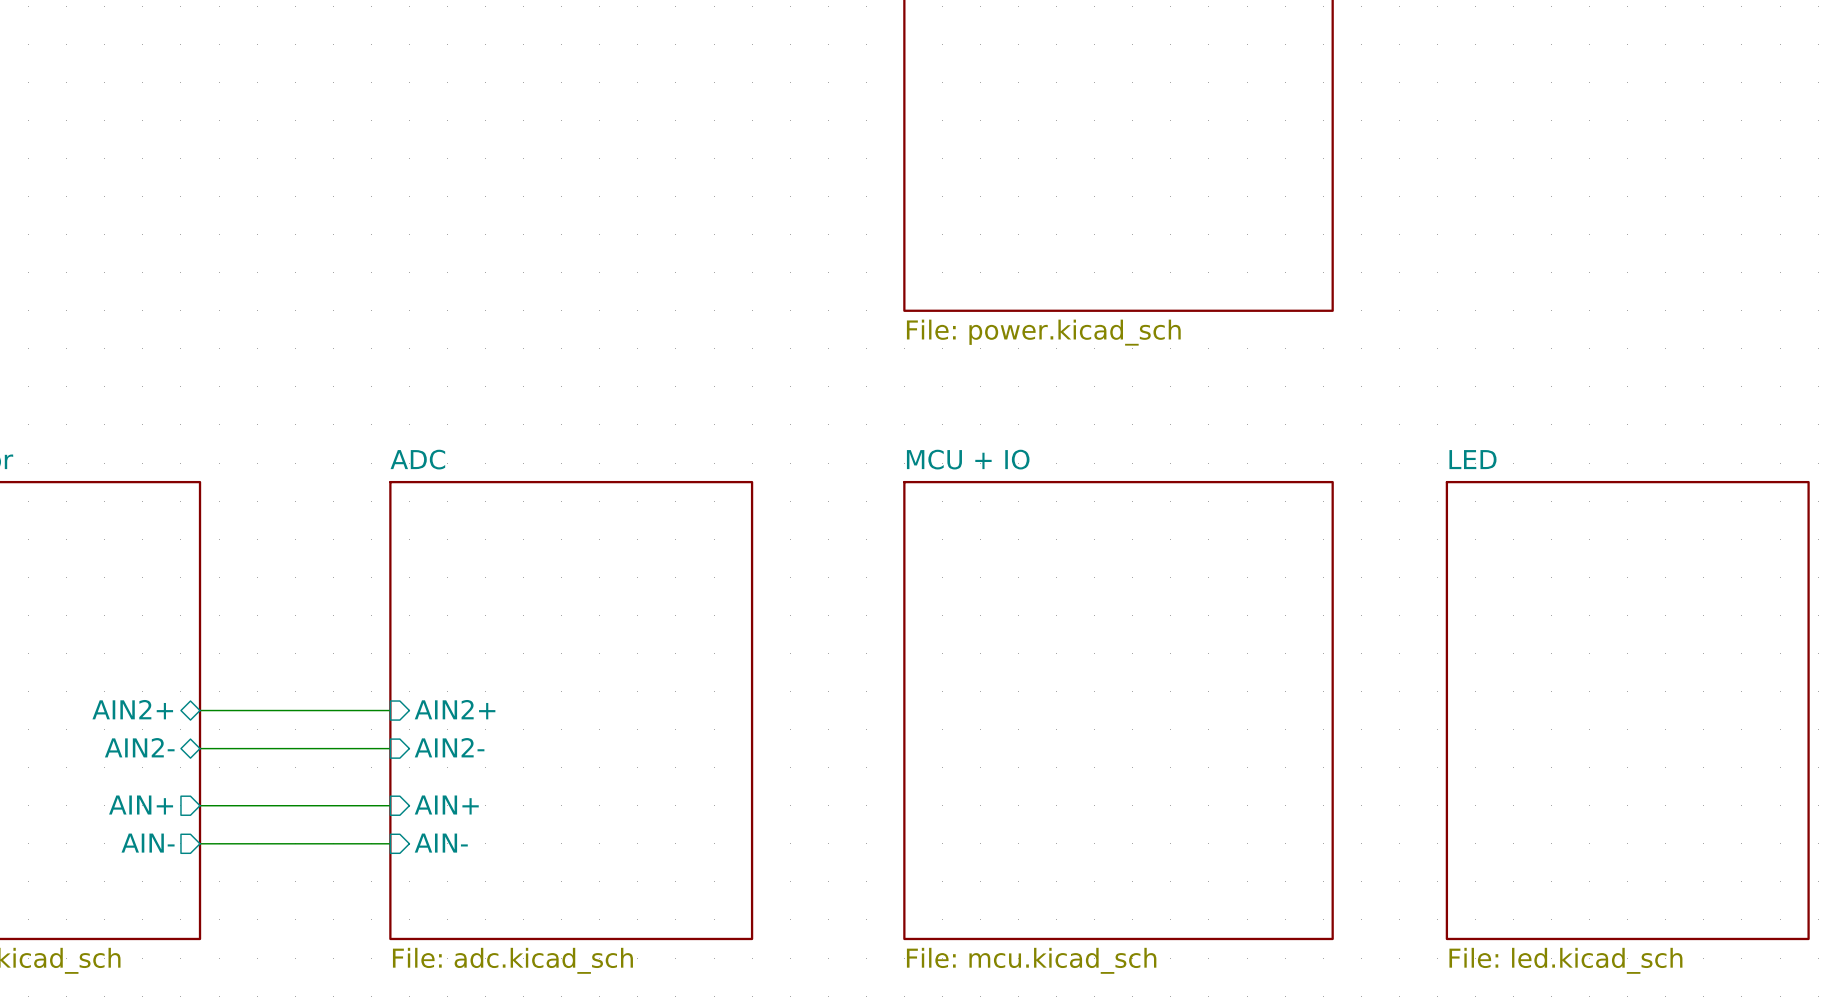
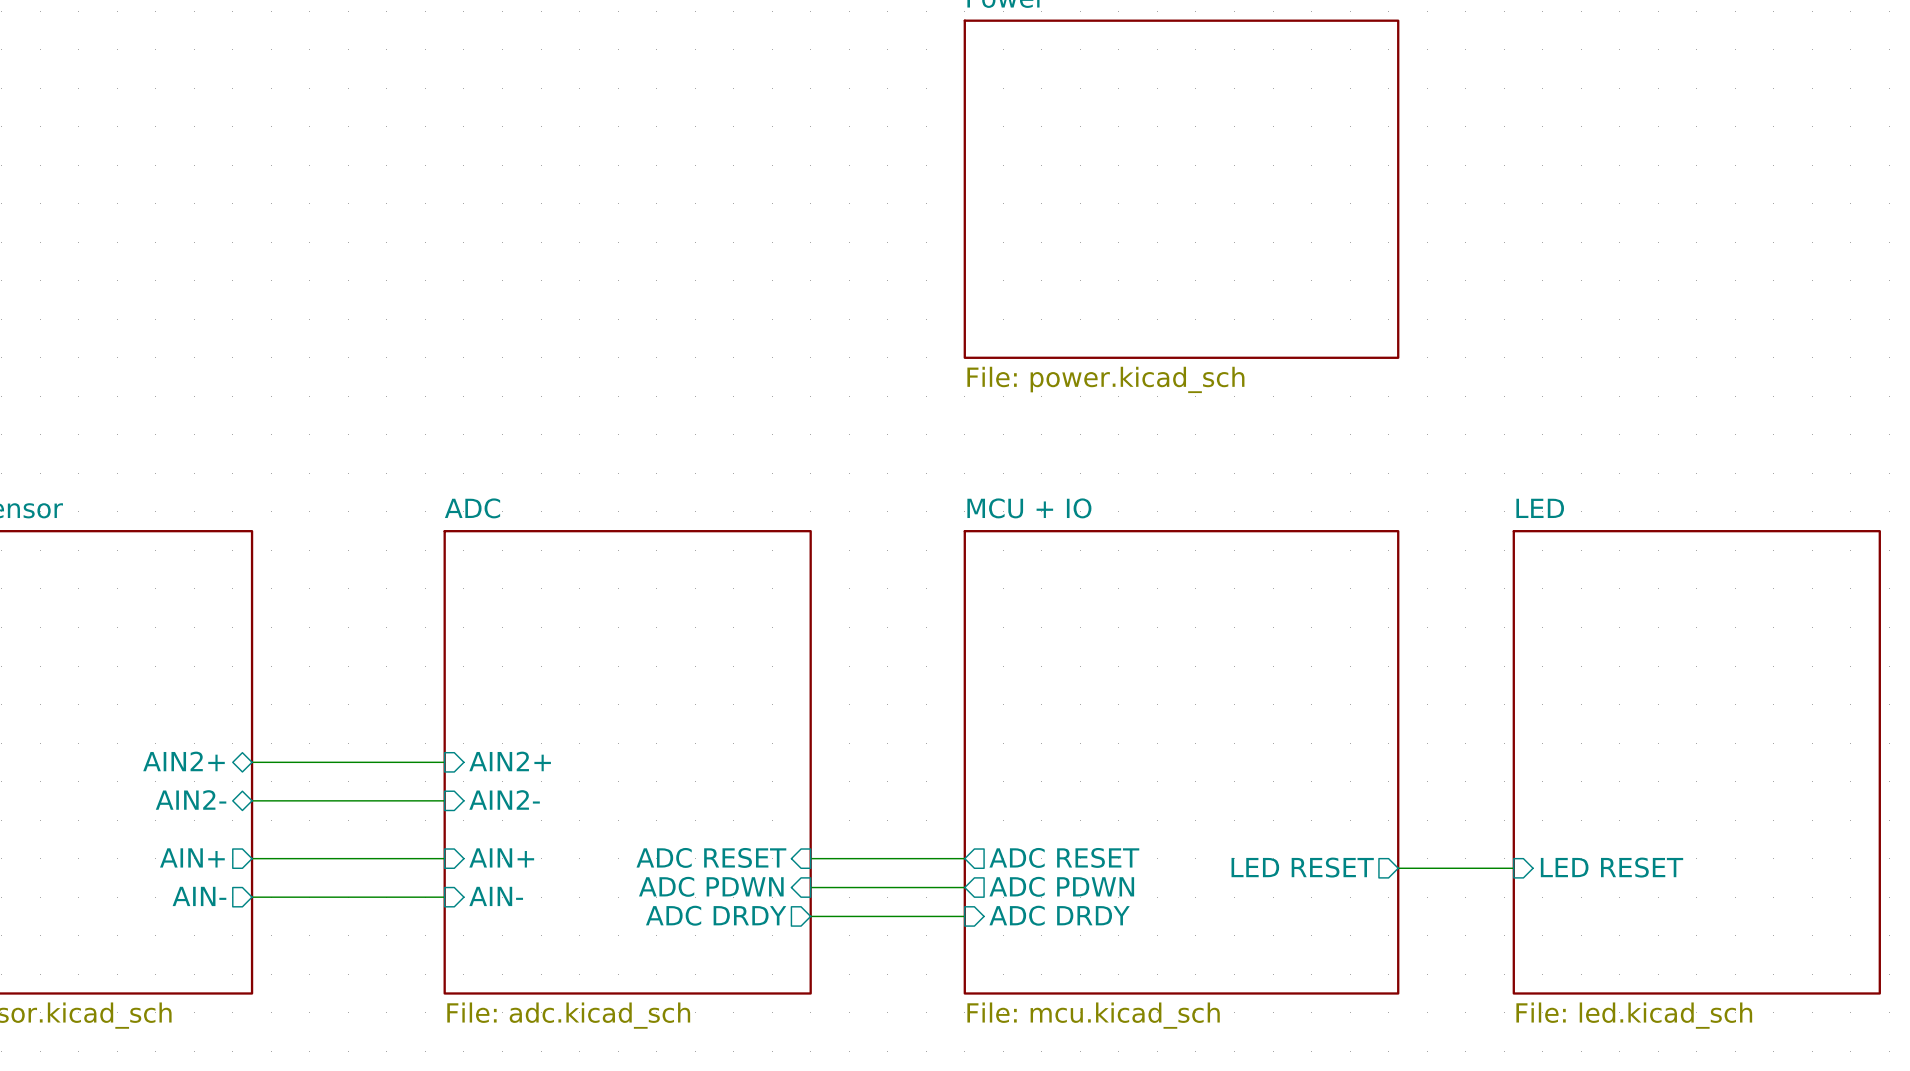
sheet pin: none -> ADC RESET (711, 857)
wire: none -> (810, 858) (964, 858)
sheet pin: none -> ADC RESET (1064, 857)
sheet pin: none -> LED RESET (1302, 867)
sheet pin: none -> LED RESET (1612, 867)
wire: none -> (1398, 868) (1513, 868)
sheet pin: none -> ADC PDWN (711, 886)
sheet pin: none -> ADC PDWN (1061, 886)
wire: none -> (810, 887) (964, 887)
sheet pin: none -> ADC DRDY (716, 915)
wire: none -> (810, 916) (964, 916)
sheet pin: none -> ADC DRDY (1059, 915)

